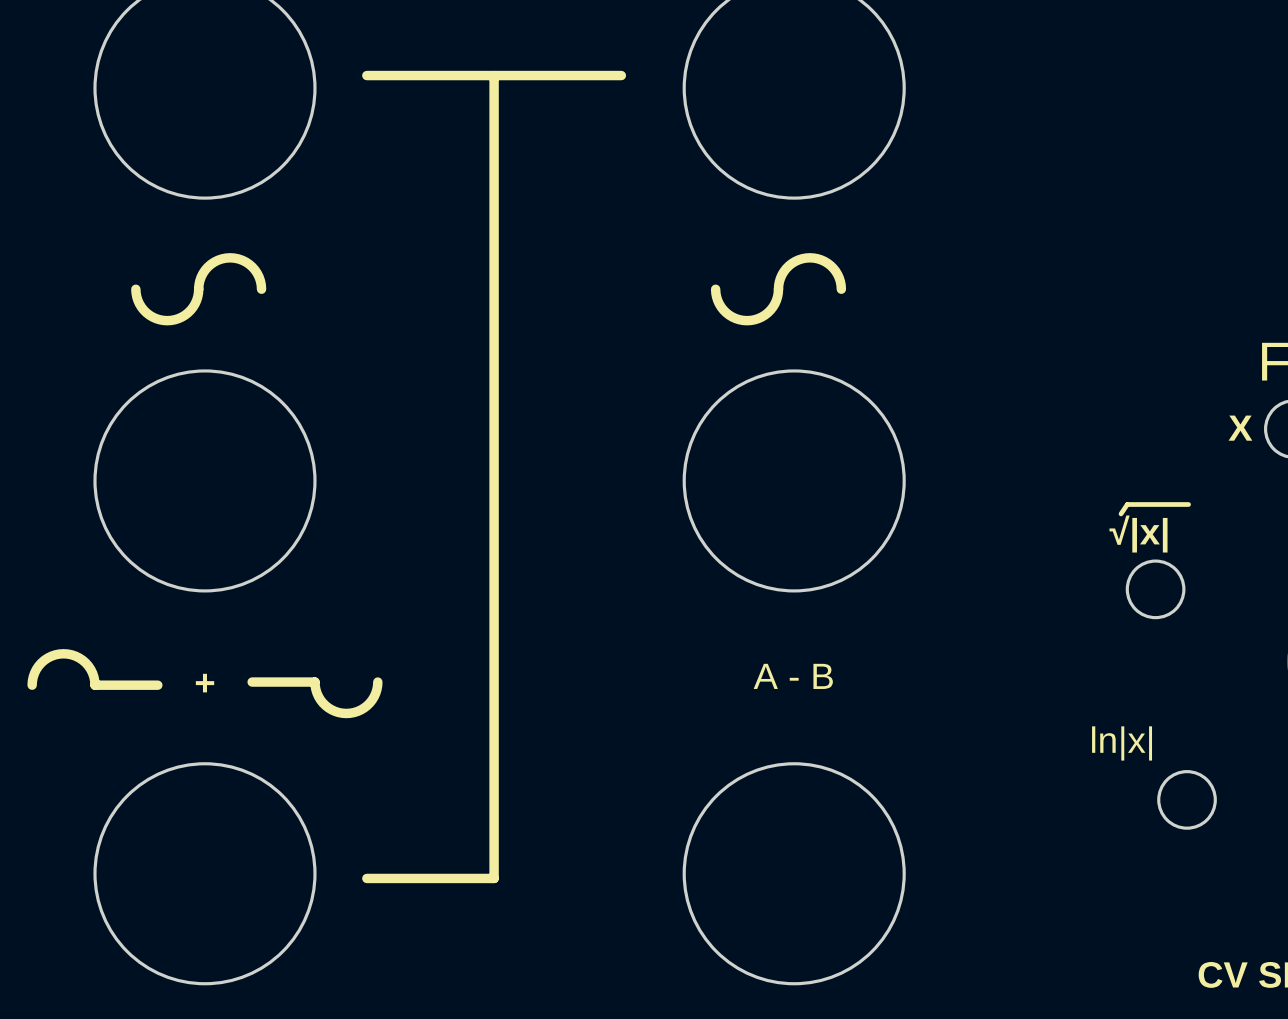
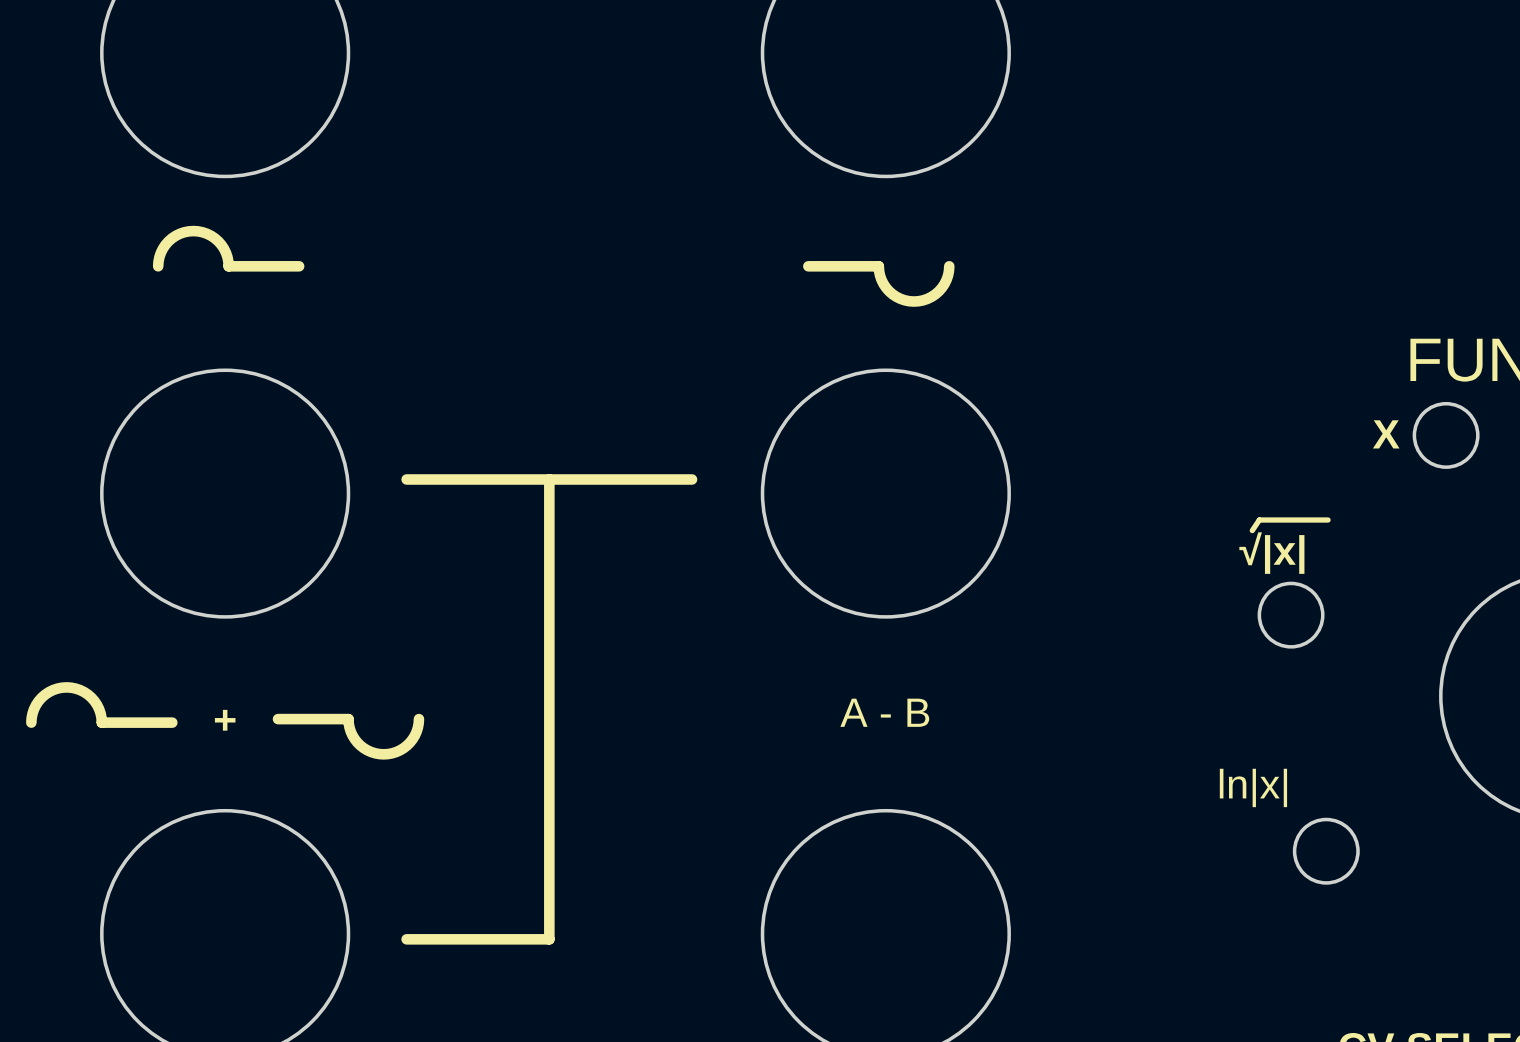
line: (366, 75) (621, 75) -> (406, 479) (692, 479)
line: (494, 75) (494, 468) -> none
line: none -> (158, 266) (160, 252) (168, 241) (179, 233) (193, 231) (206, 233) (218, 241) (225, 252) (228, 266) (299, 266)
line: none -> (808, 266) (878, 266) (881, 279) (889, 291) (900, 298) (914, 301) (927, 298) (938, 291) (946, 279) (949, 266)
line: (135, 289) (139, 303) (146, 312) (156, 318) (167, 320) (181, 317) (190, 310) (196, 300) (202, 273) (210, 264) (221, 258) (234, 258) (249, 264) (259, 277) (261, 289) -> none
line: (715, 289) (717, 300) (723, 310) (735, 318) (747, 320) (758, 318) (770, 310) (776, 300) (782, 274) (789, 265) (798, 259) (813, 258) (827, 263) (837, 274) (841, 289) -> none

